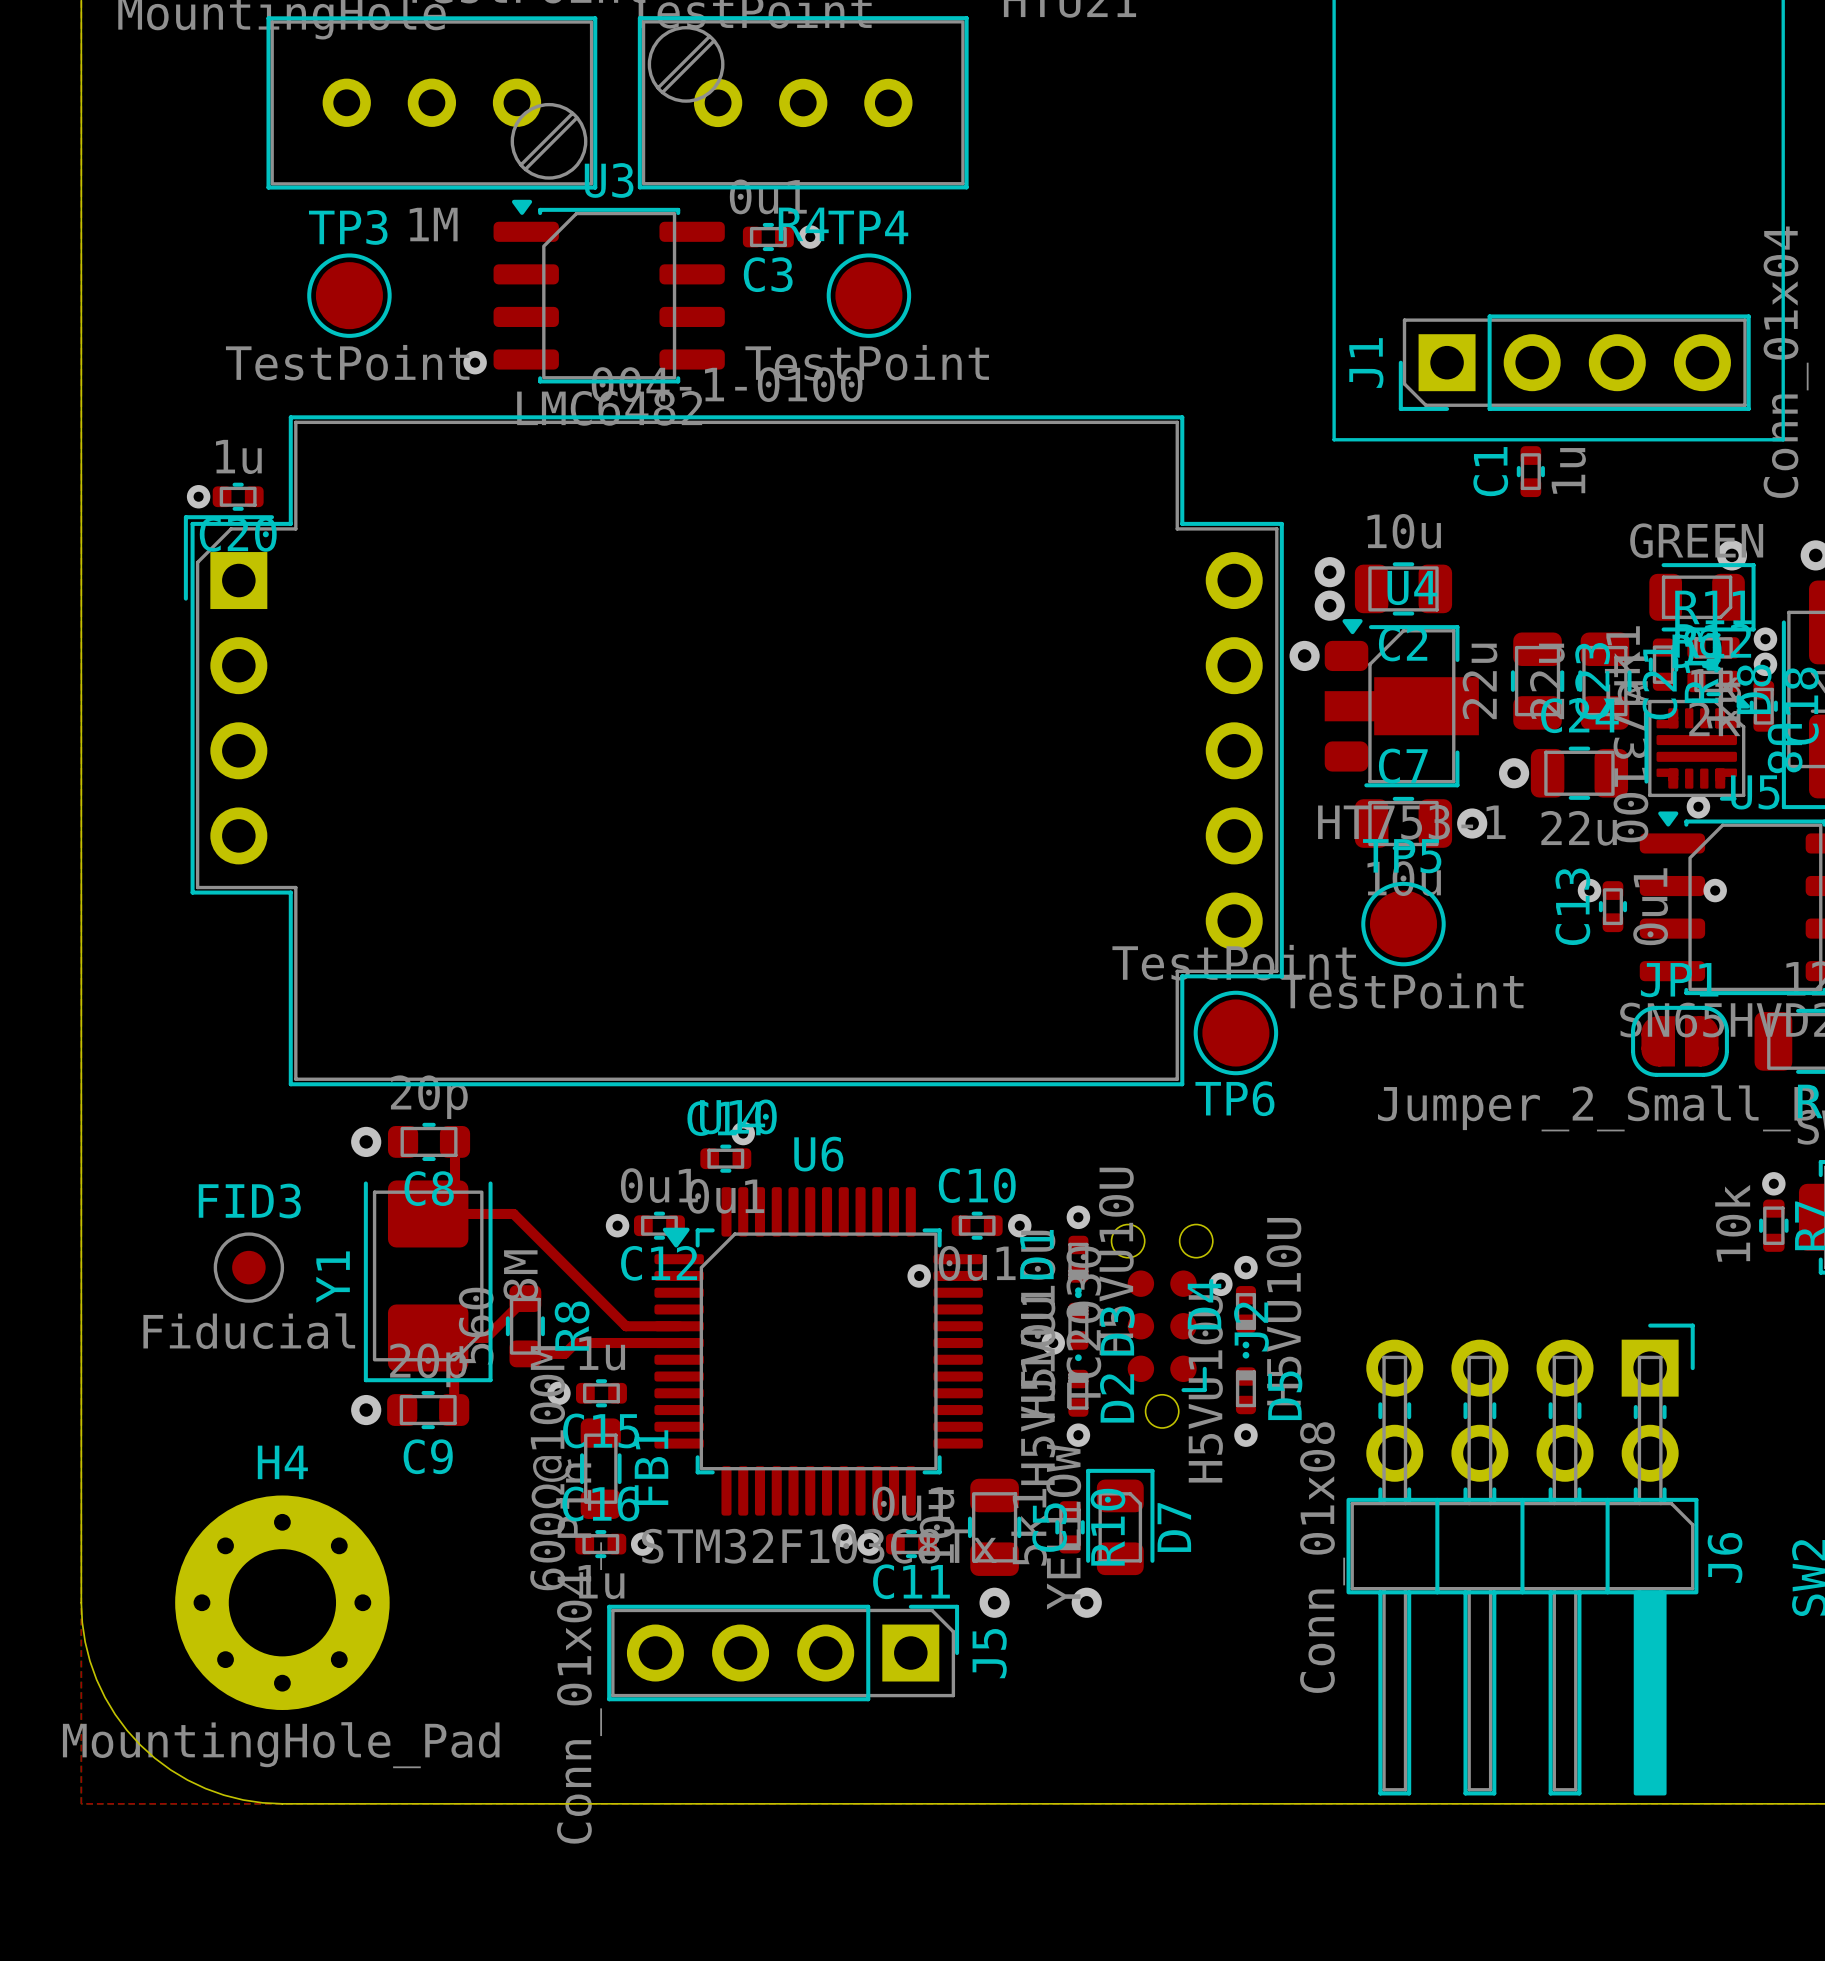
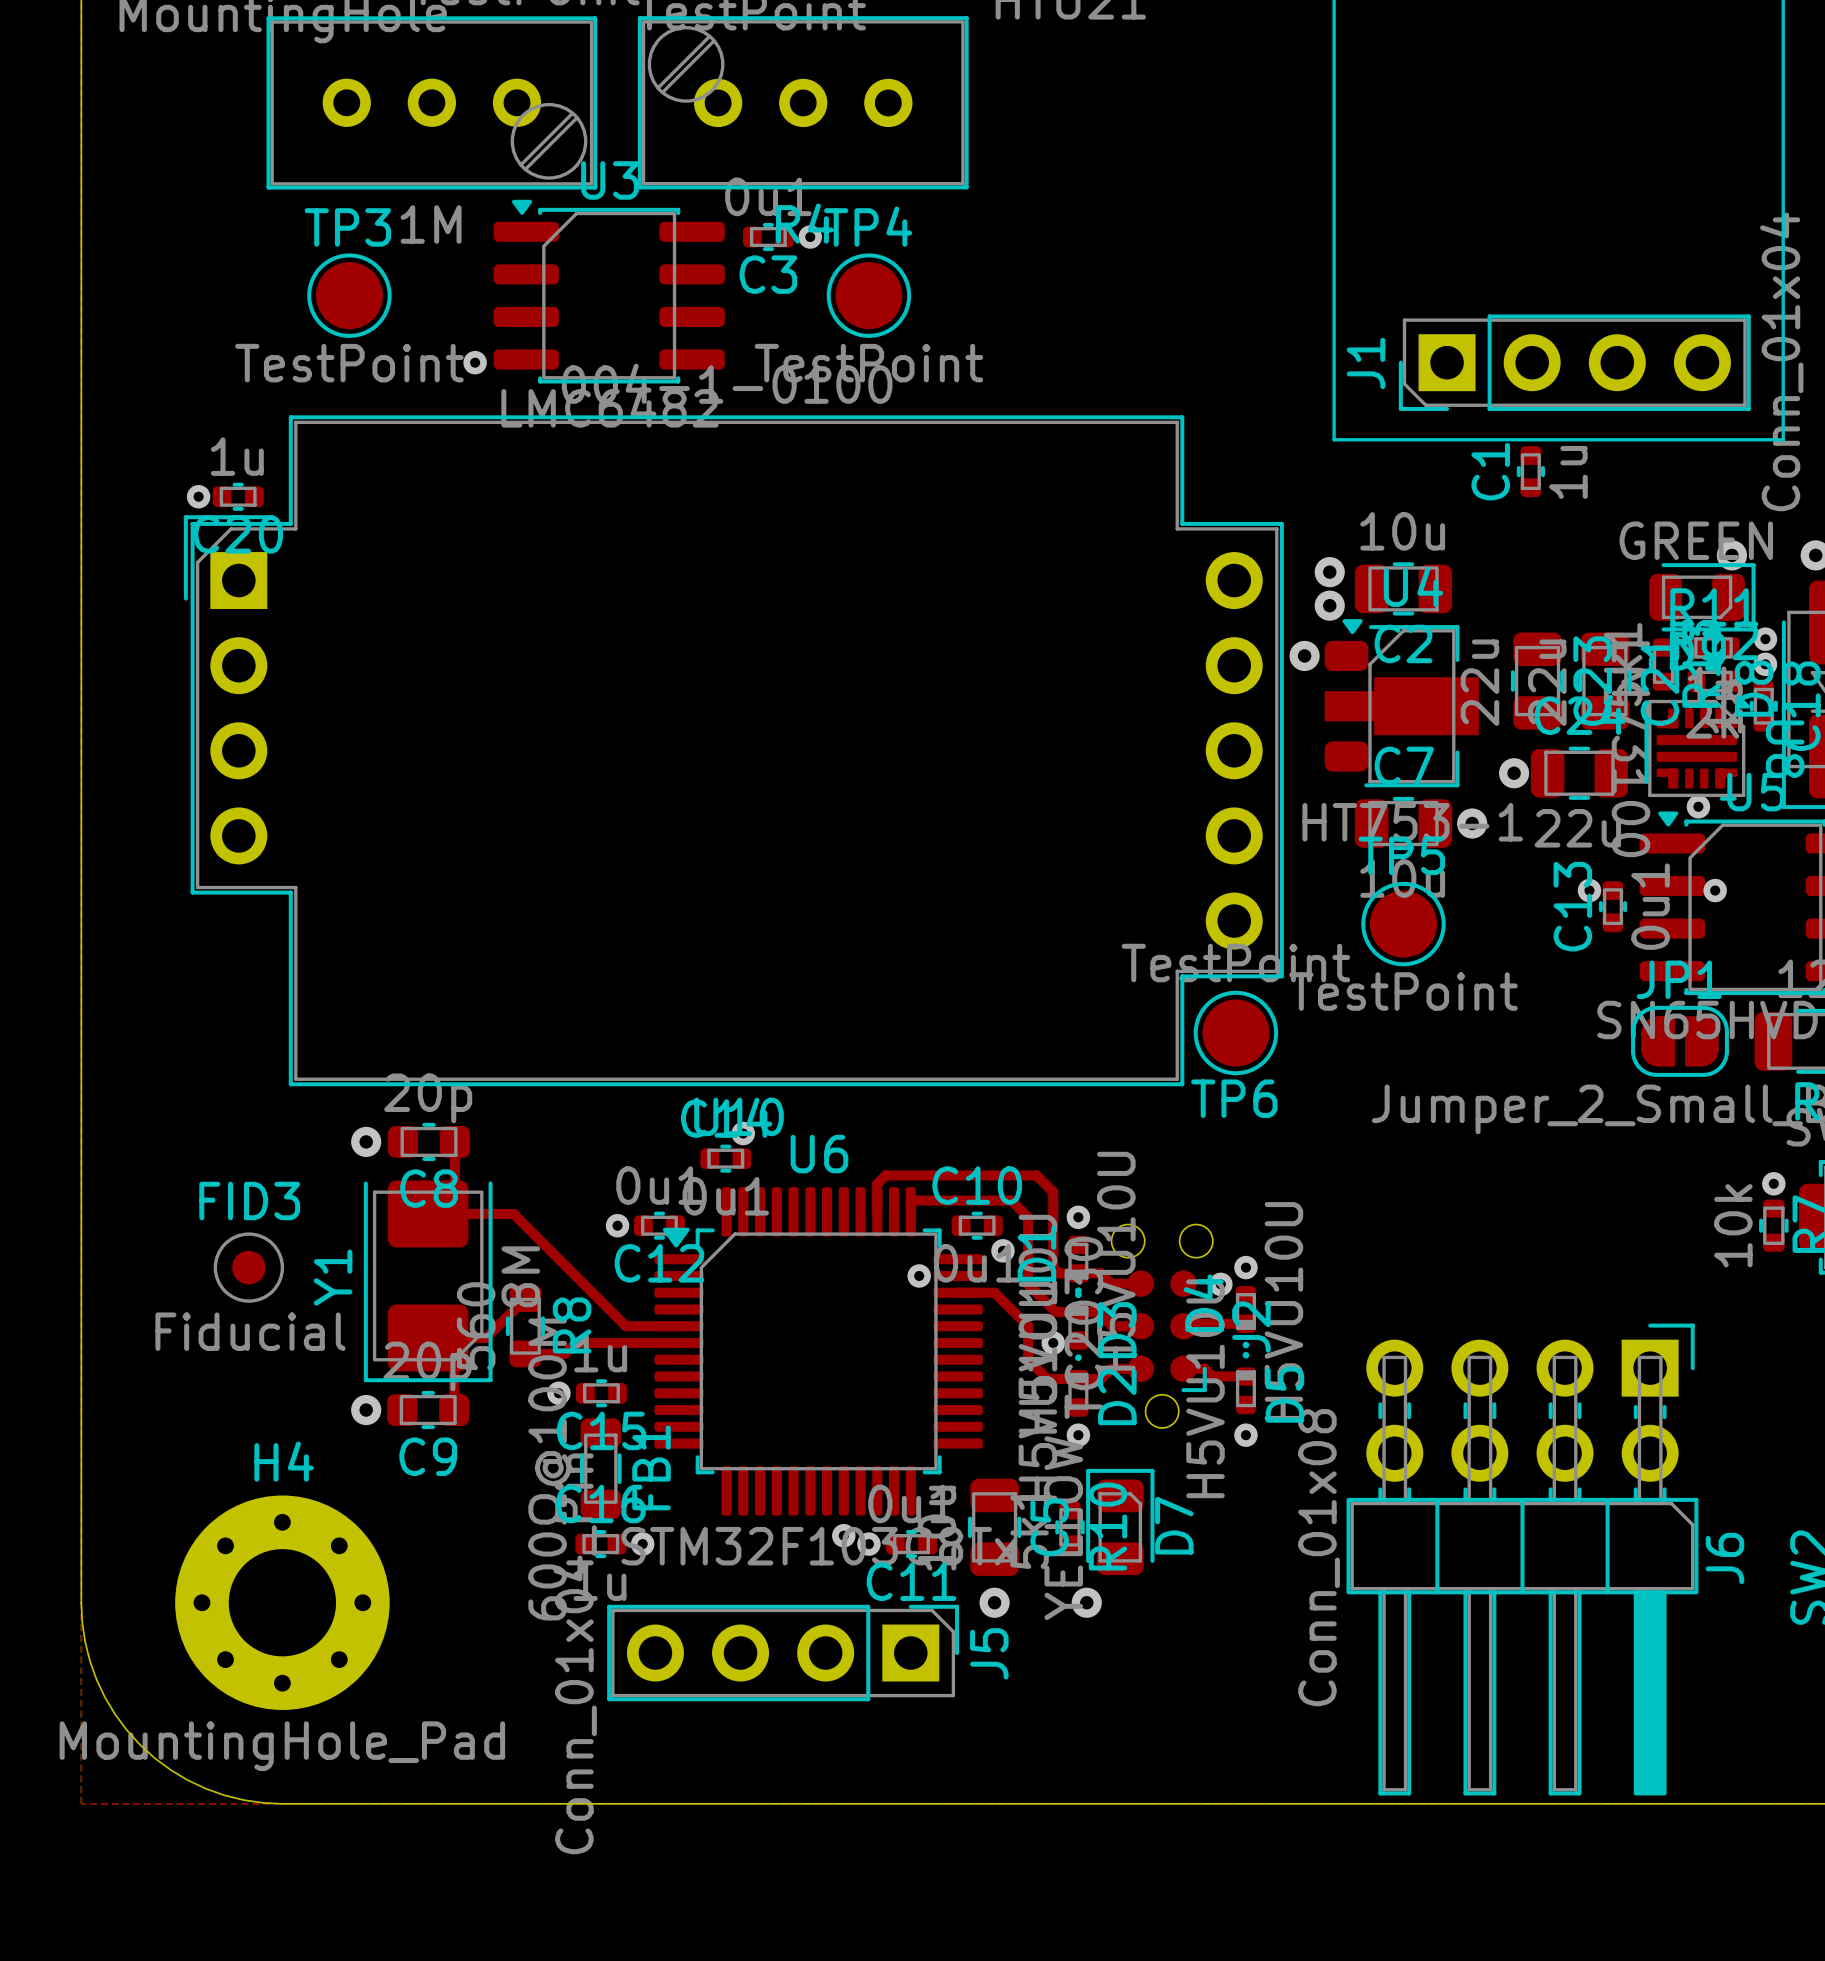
top track: none -> (877, 1211) (877, 1183) (885, 1175) (1036, 1175) (1053, 1192) (1053, 1267) (1059, 1273) (1101, 1273) (1111, 1283) (1140, 1283)
top track: none -> (910, 1211) (910, 1200) (1011, 1200) (1028, 1217) (1028, 1284) (1055, 1312) (1097, 1312) (1111, 1326) (1140, 1326)
via position: (1019, 1225) -> (1002, 1250)
top track: none -> (958, 1292) (994, 1292) (1028, 1326) (1028, 1359) (1047, 1379) (1101, 1379) (1111, 1368) (1140, 1368)
top track: none -> (1245, 1323) (1185, 1323) (1183, 1326)
top track: none -> (1183, 1368) (1204, 1368) (1212, 1376) (1245, 1376)

